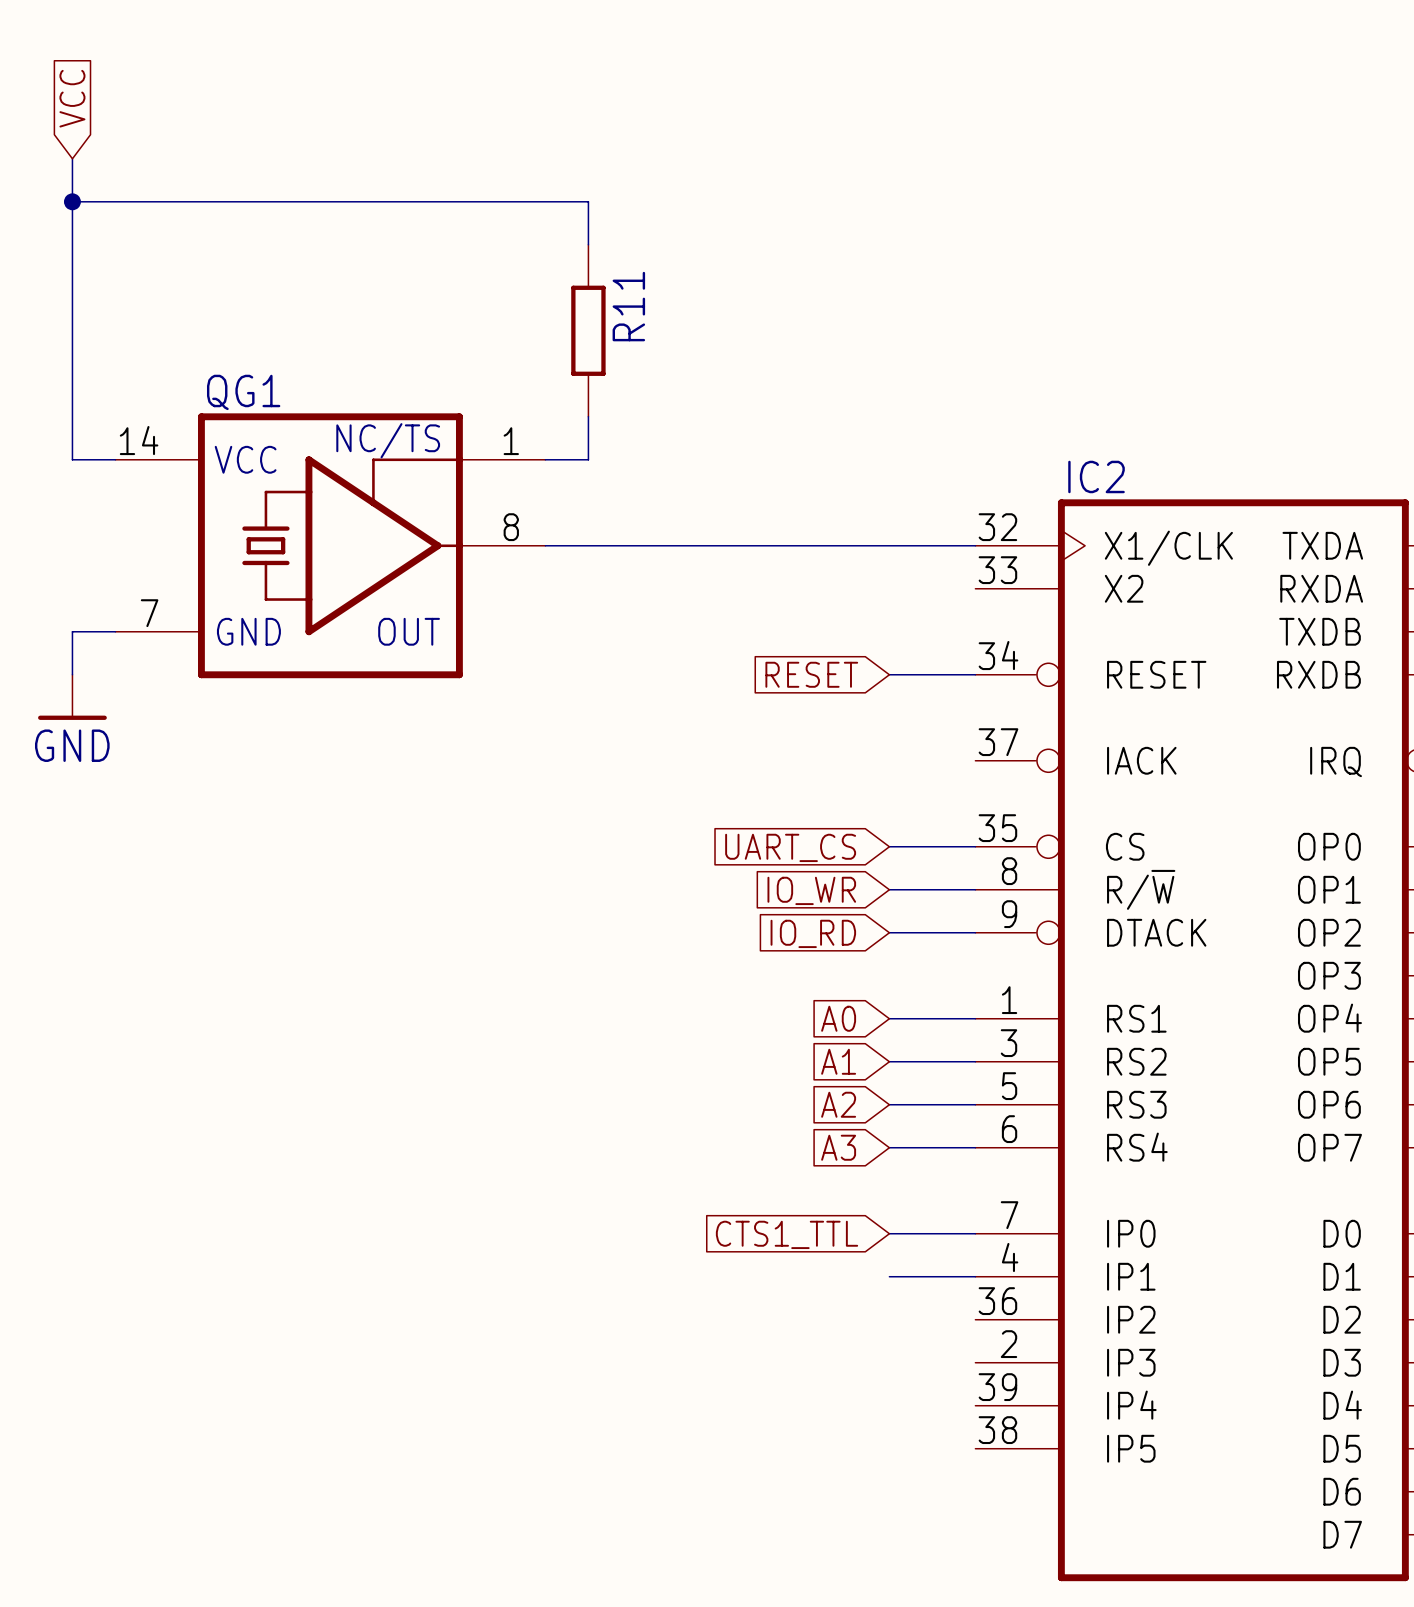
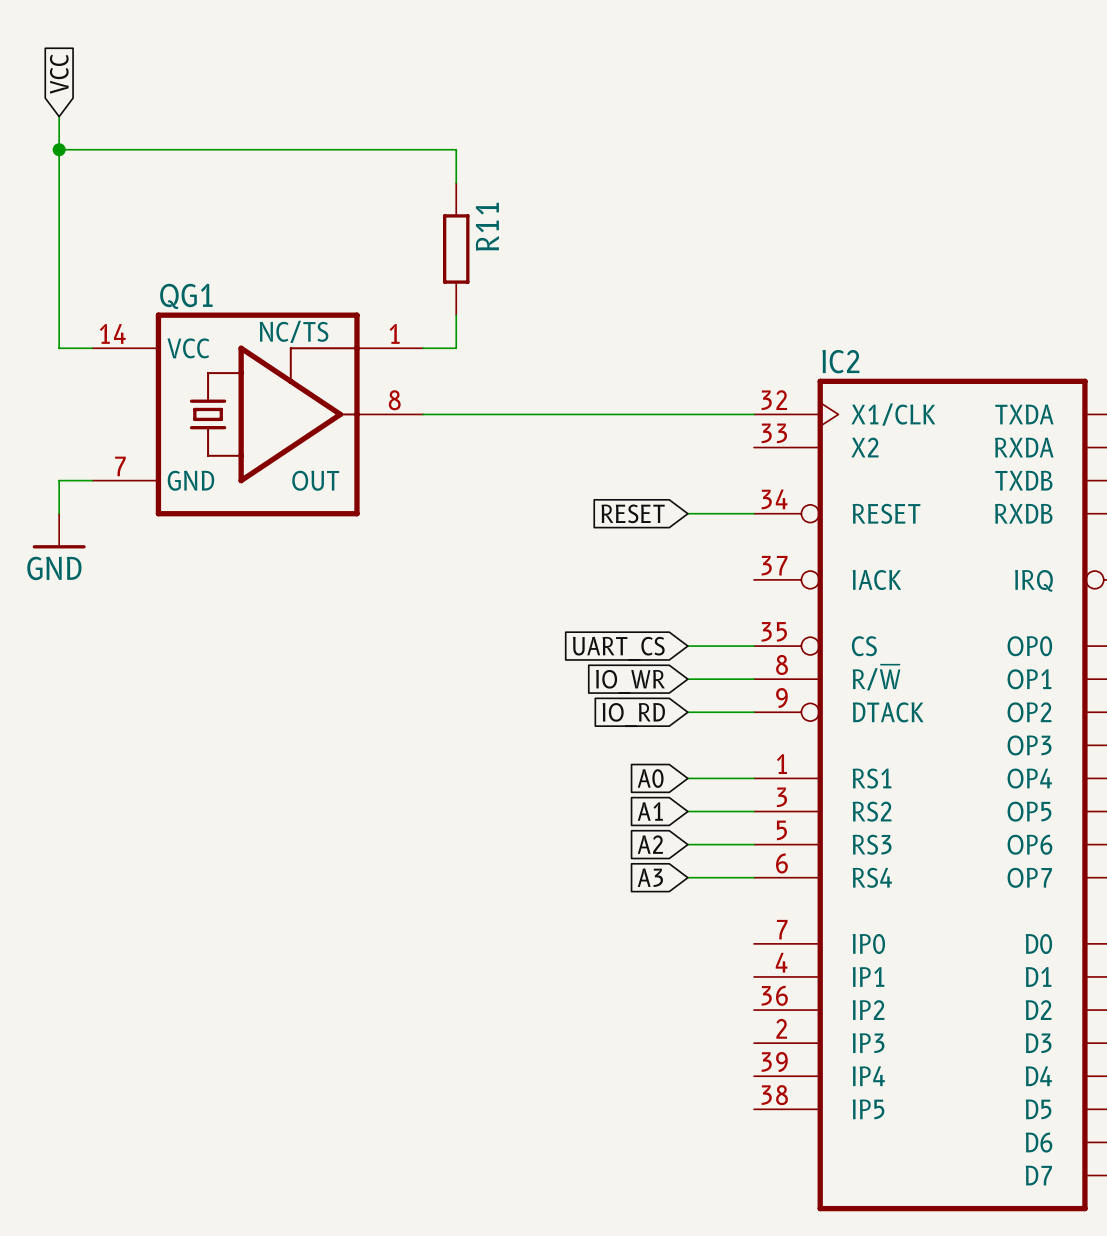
wire: (889, 1233) (975, 1233) -> none
global label: CTS1_TTL (787, 1234) -> none
wire: (889, 1276) (975, 1276) -> none

